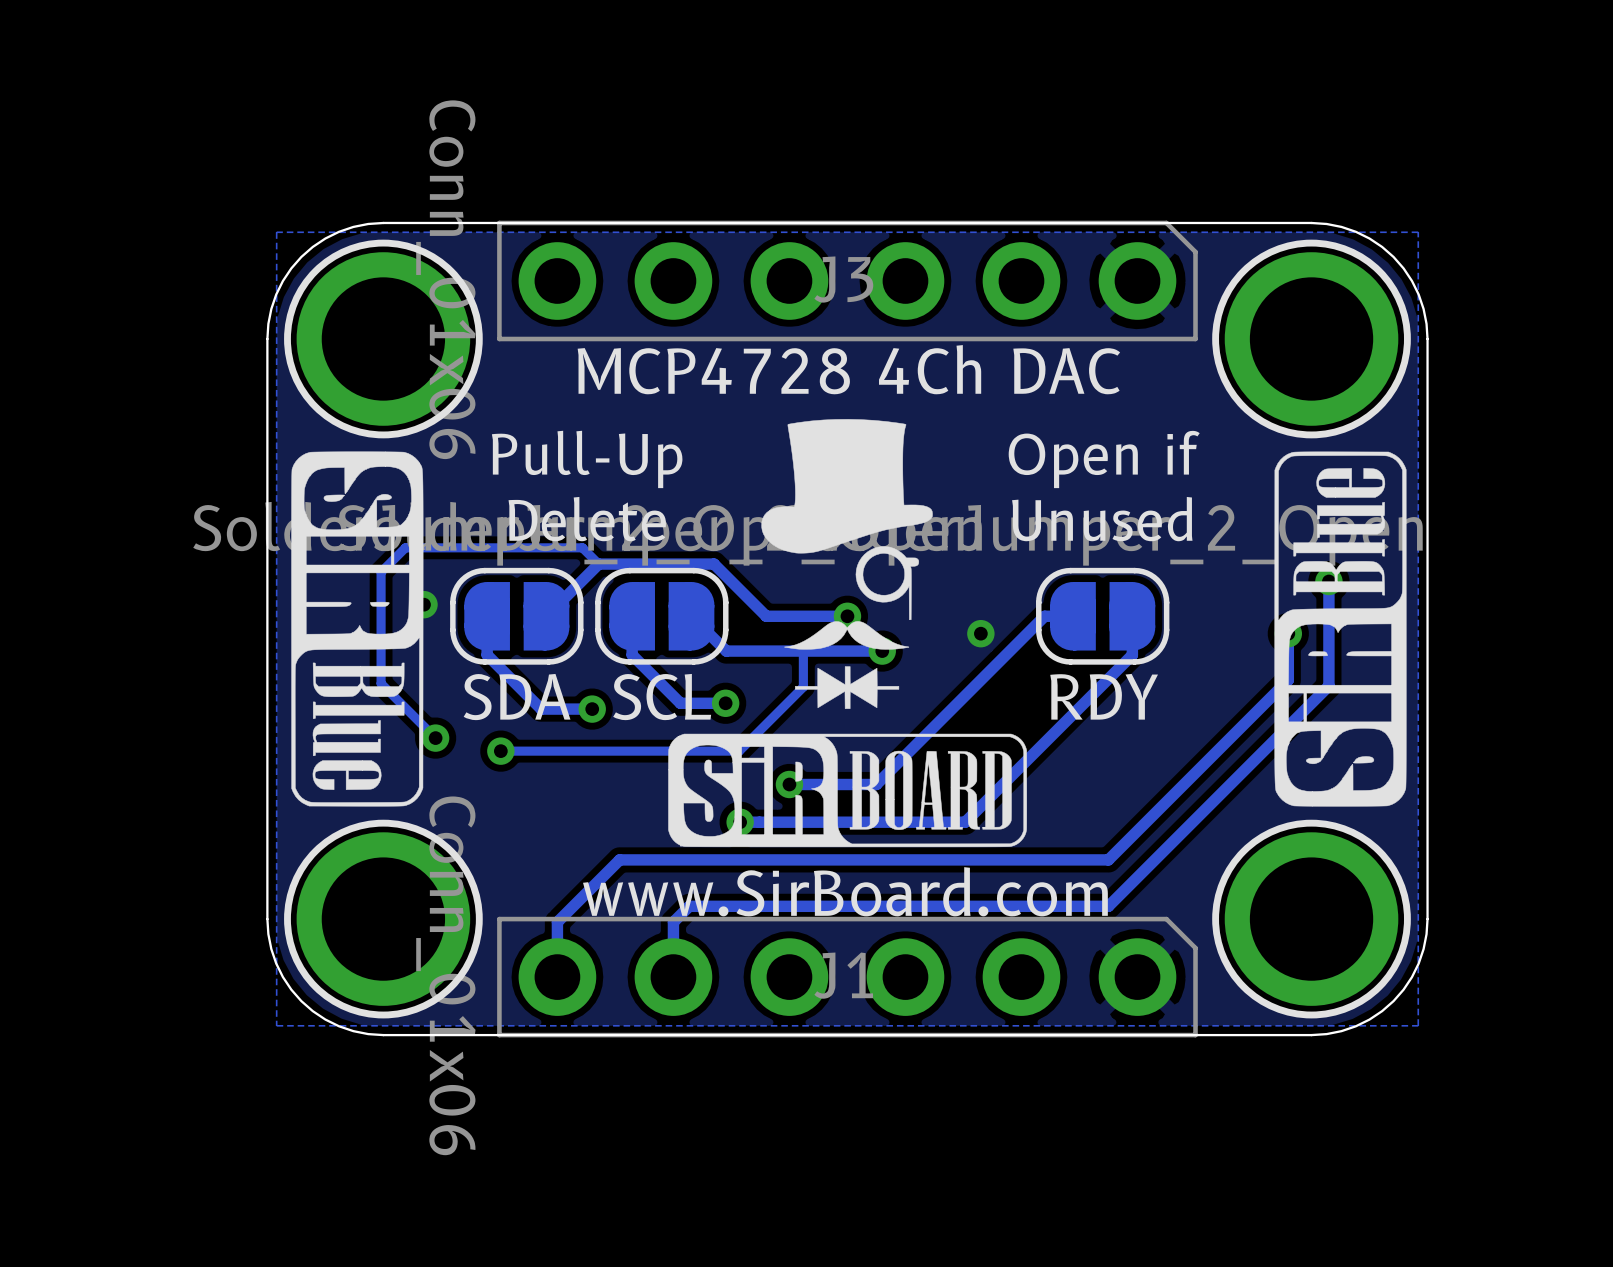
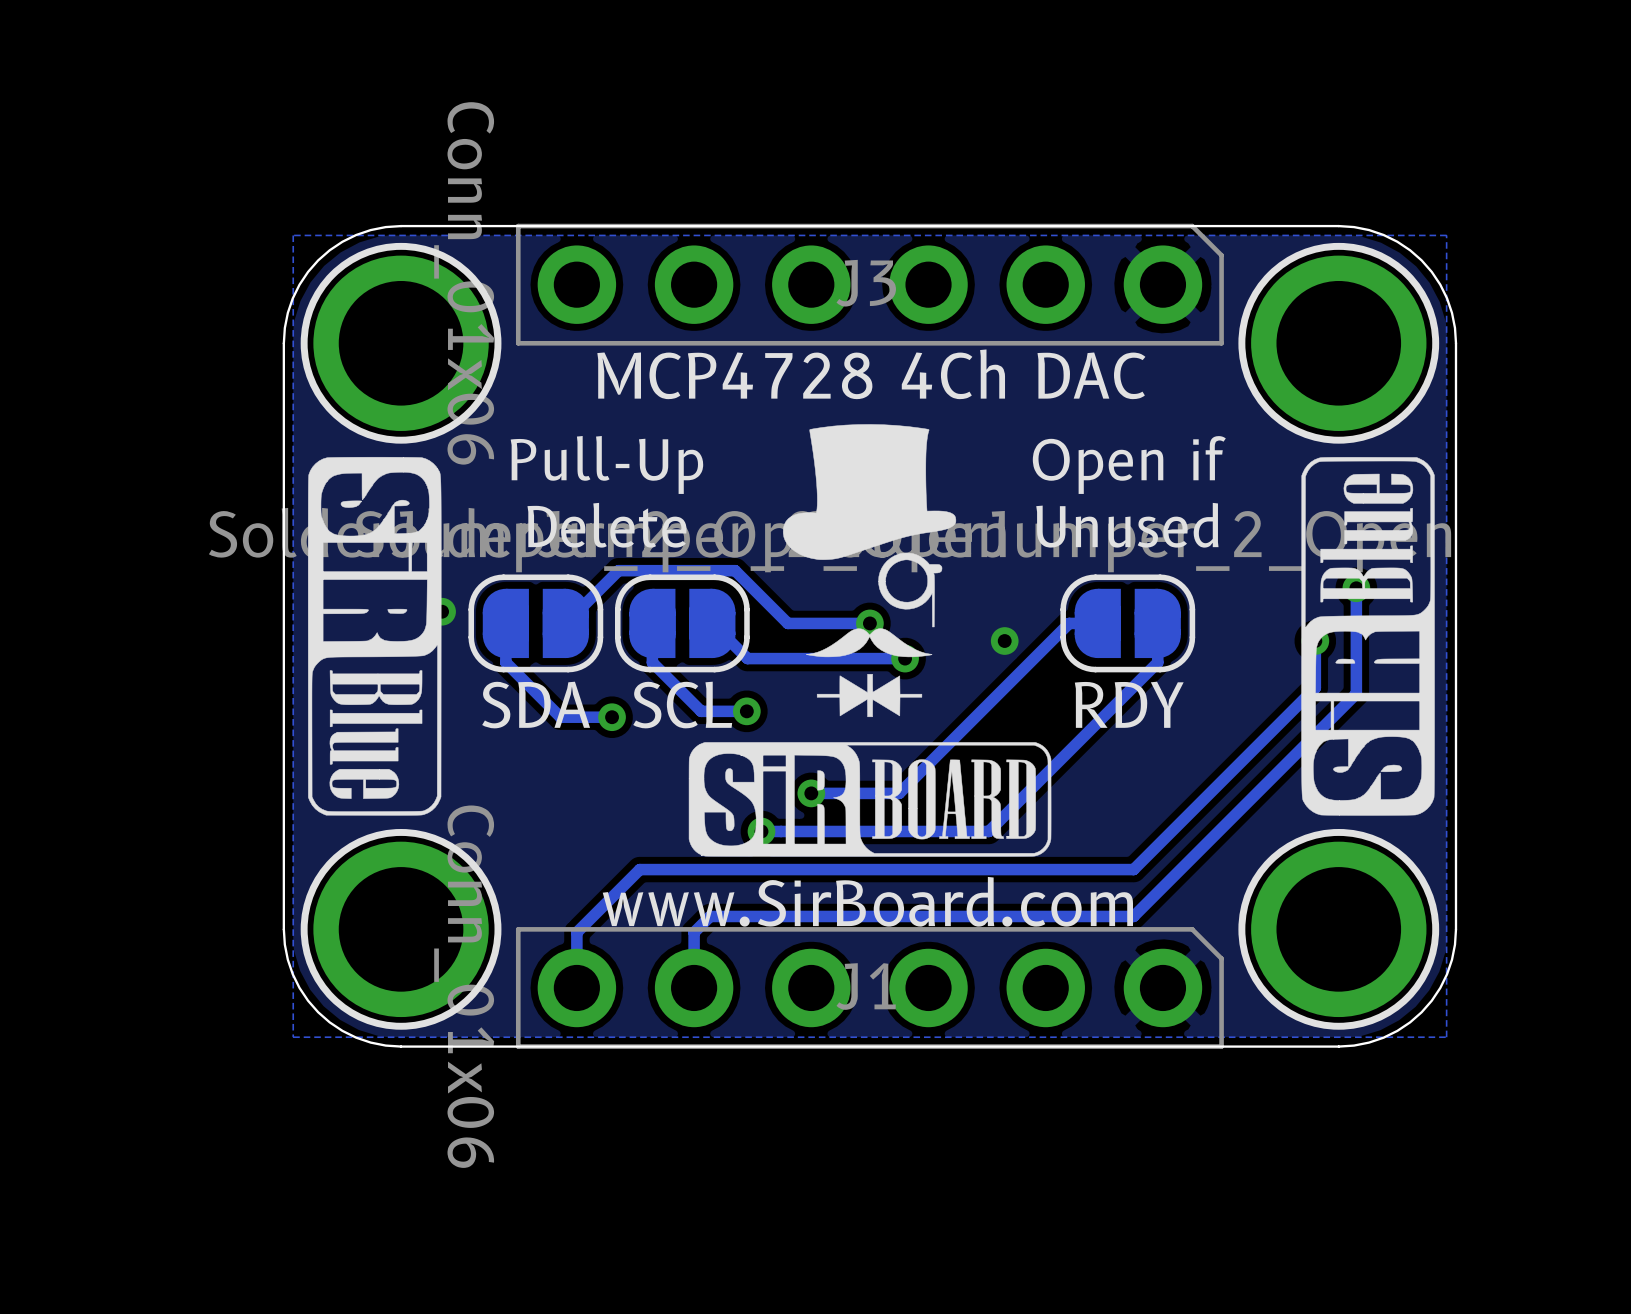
track: (598, 564) (582, 547) (405, 547) (381, 572) (381, 683) (435, 738) -> none
track: (803, 651) (803, 687) (739, 751) (500, 751) -> none
via: (435, 738) -> none
via: (500, 751) -> none

